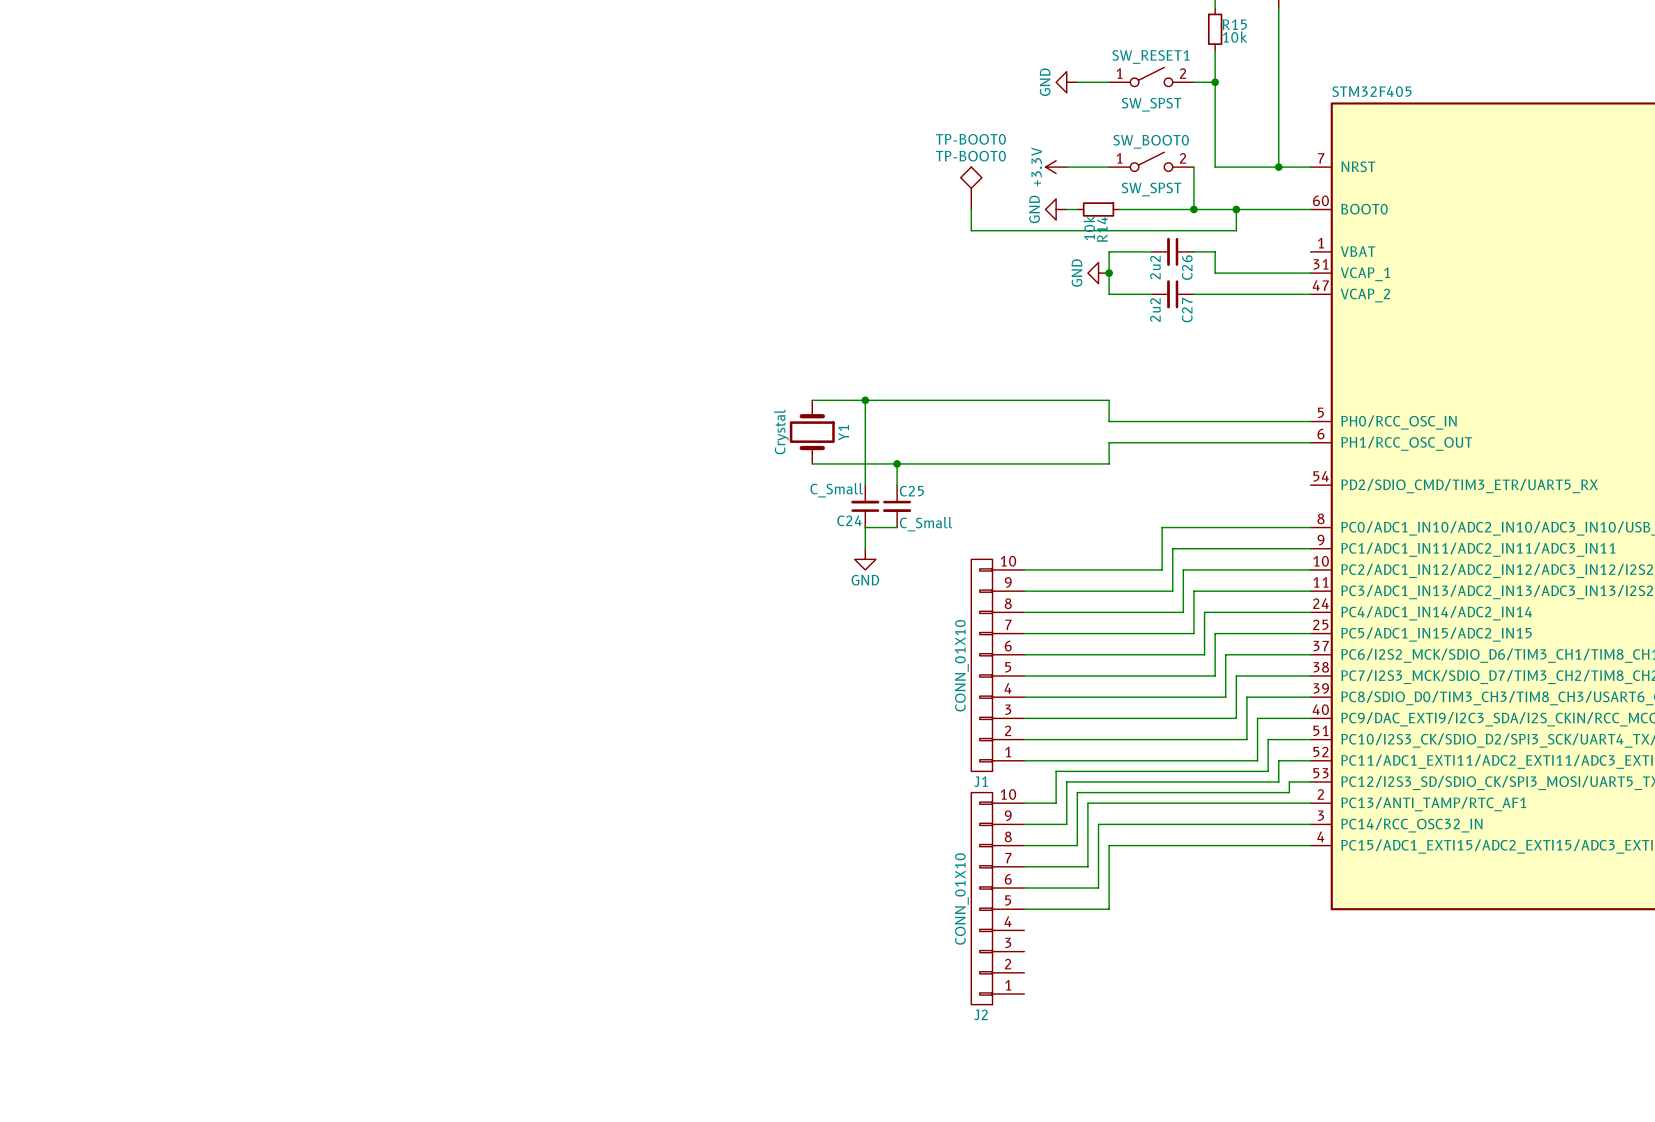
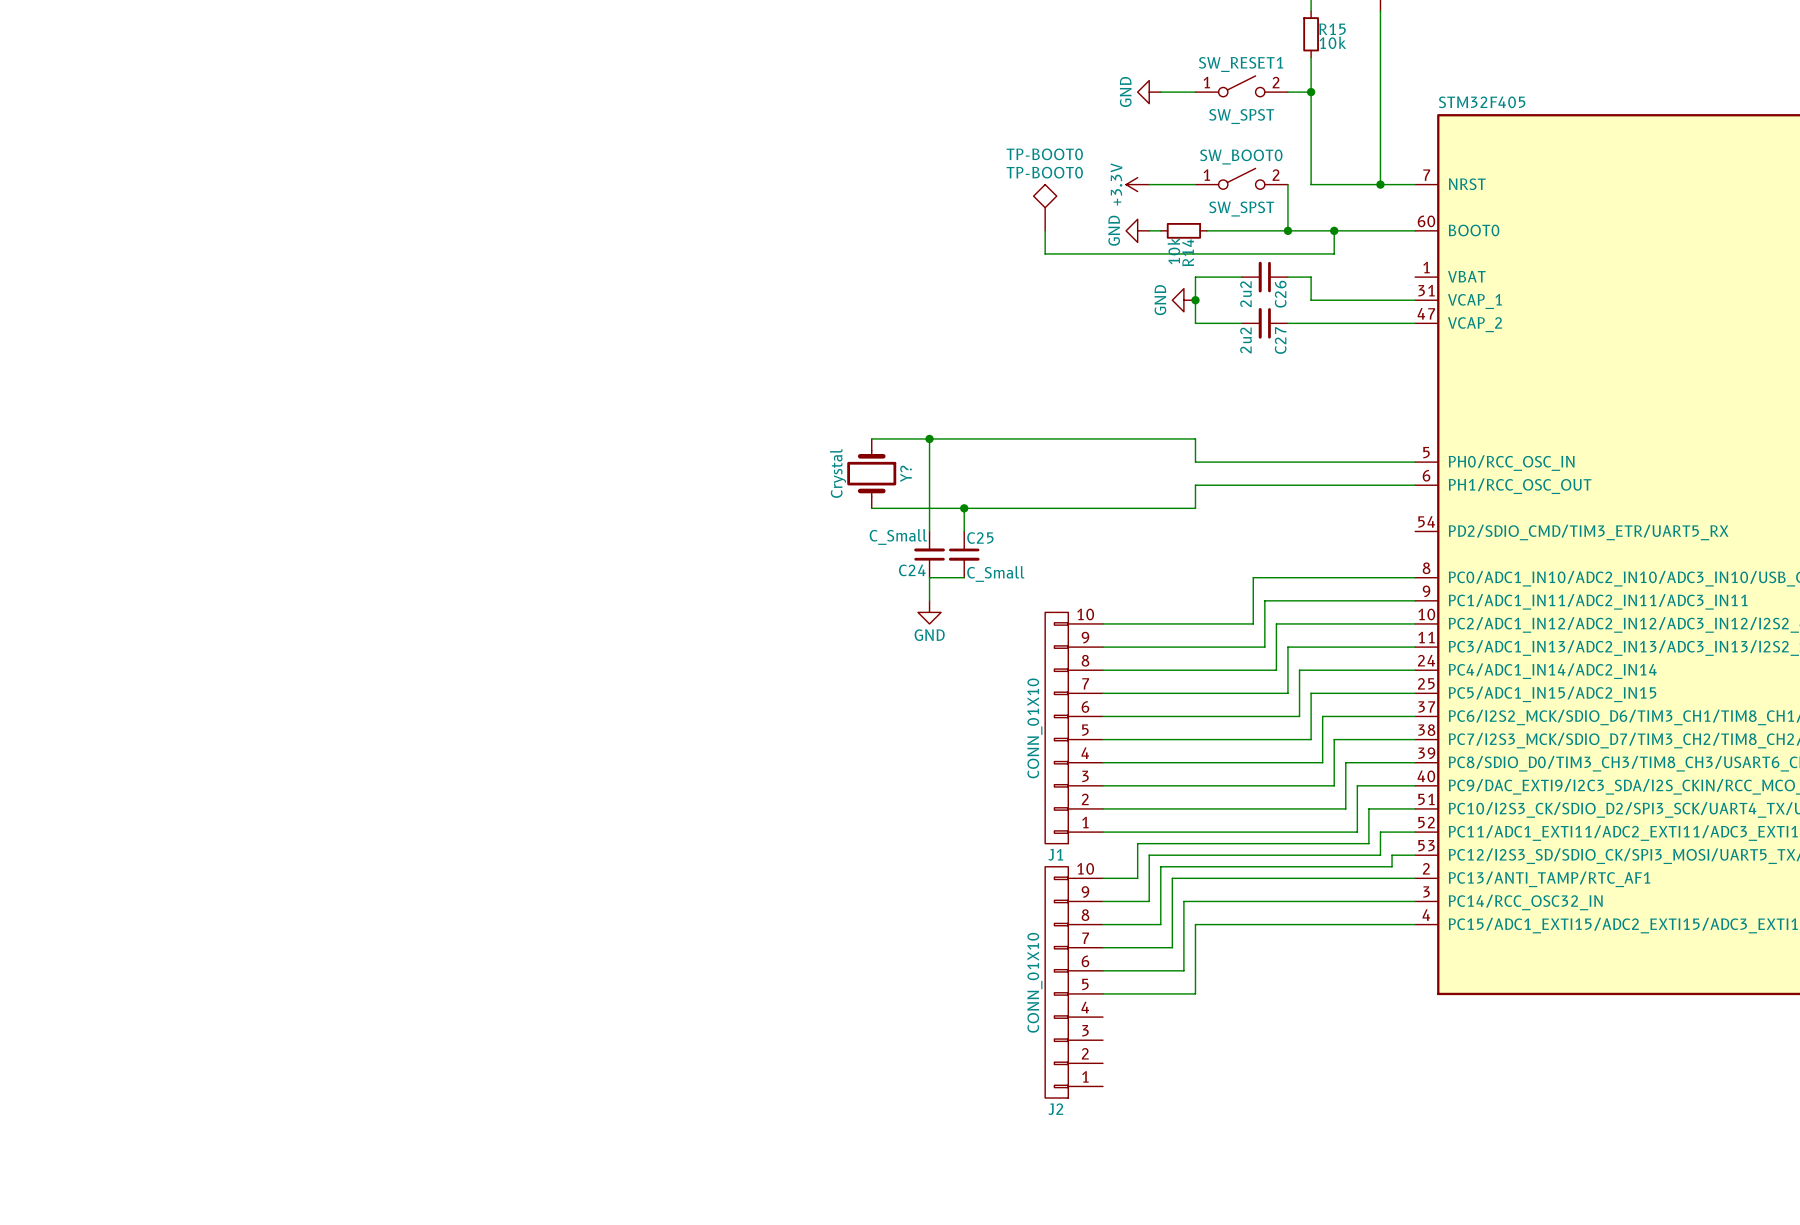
Y1 name: Y1 (843, 432) -> Y? (906, 473)

